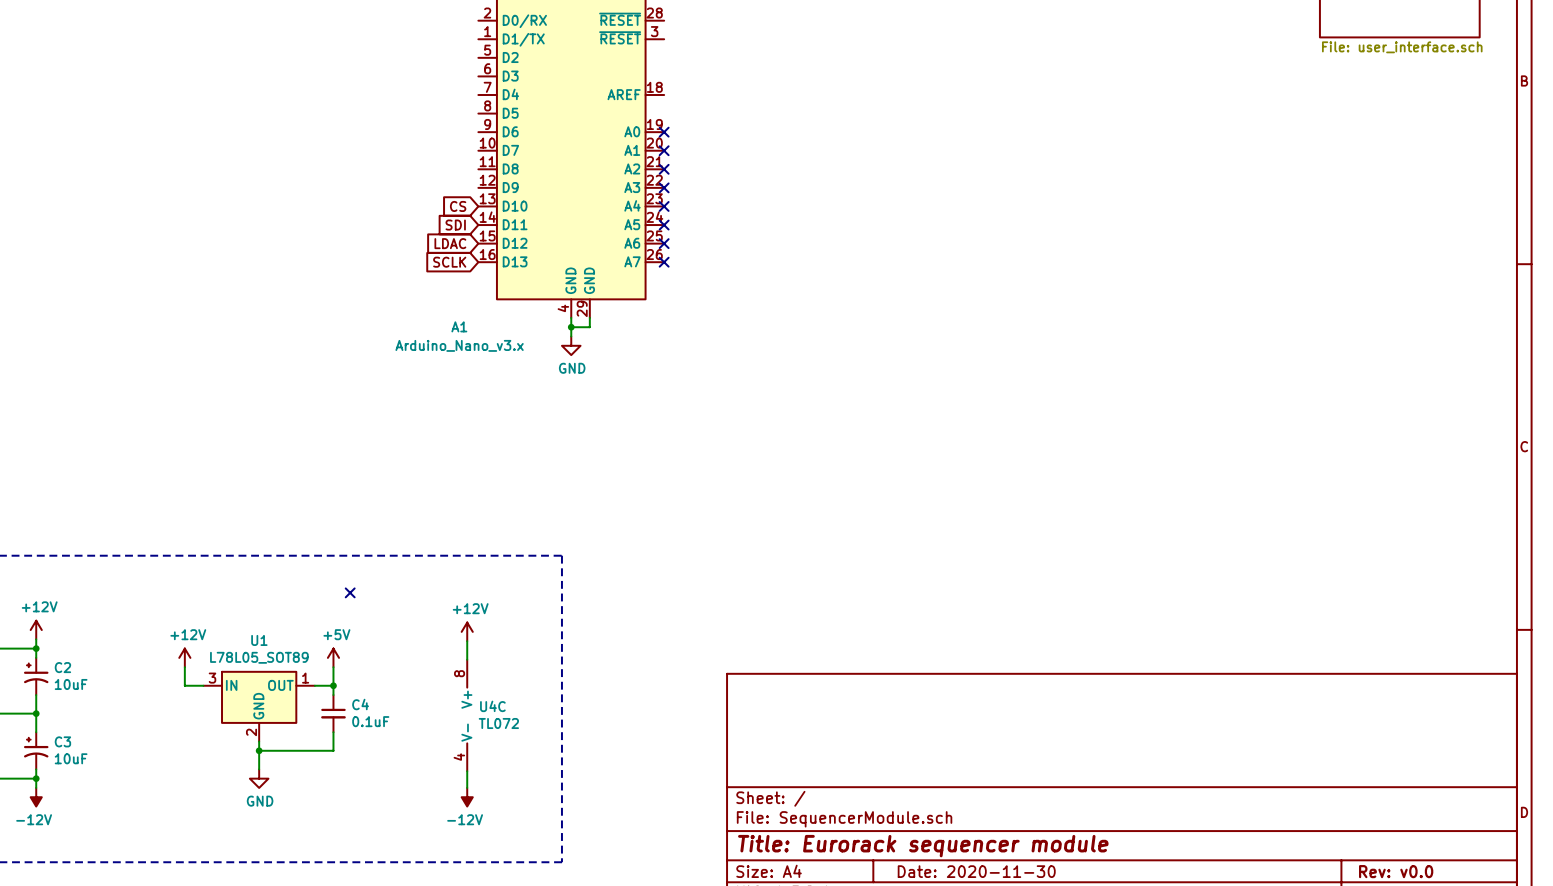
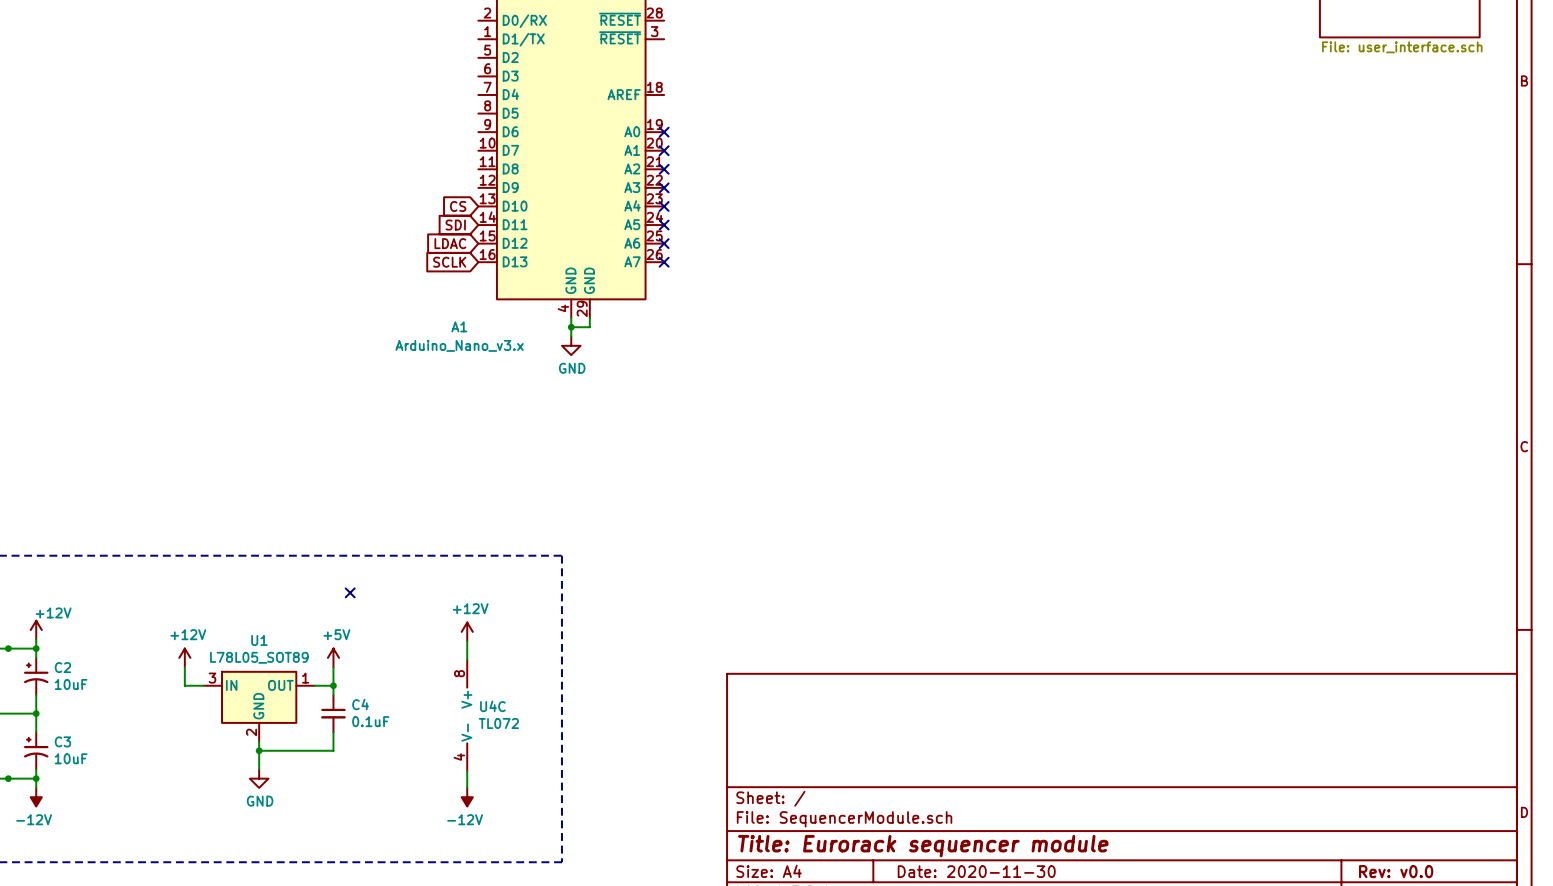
power symbol text position: +12V (39, 606) -> +12V (53, 612)
junction: none -> (8, 648)
junction: none -> (8, 778)

